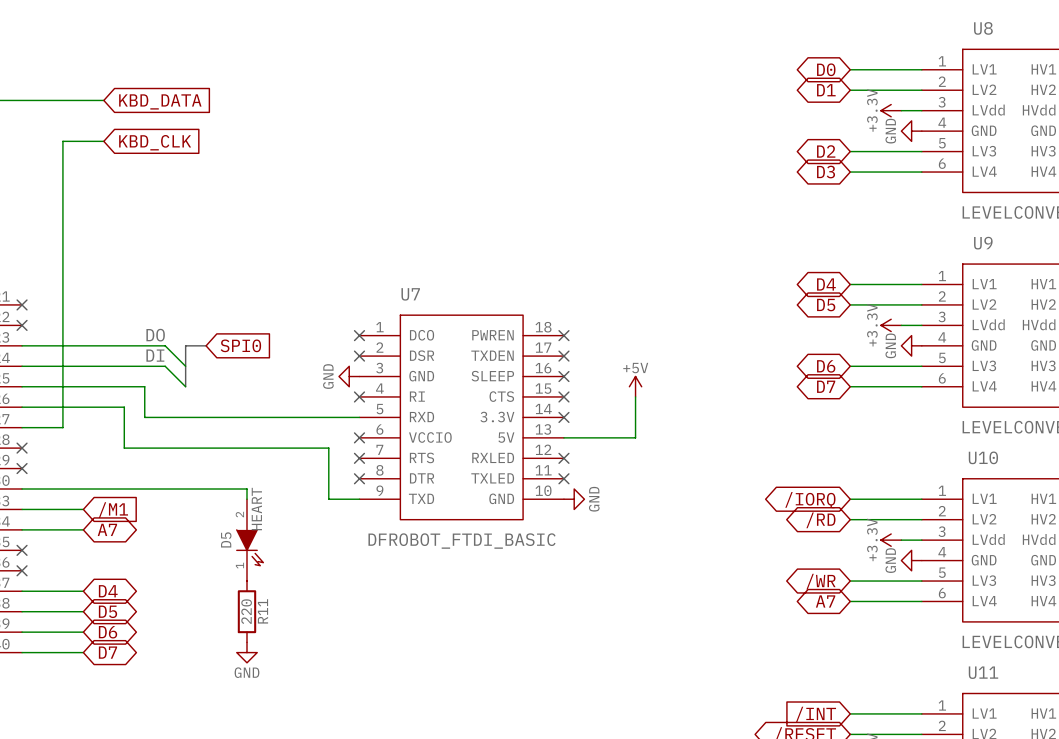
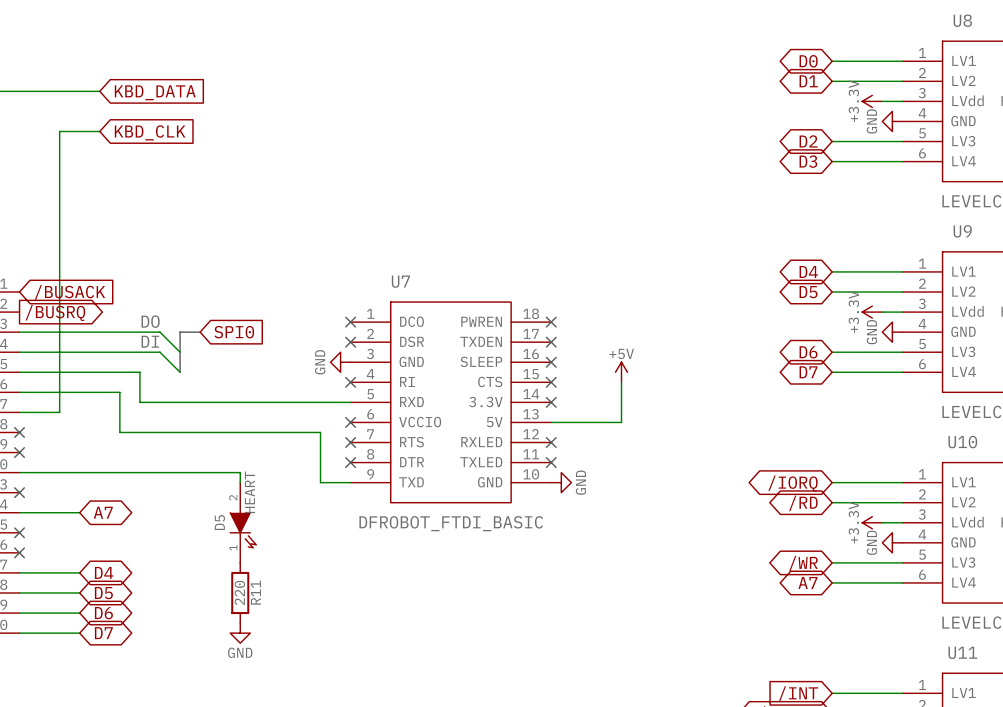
no-connect mark: (22, 304) -> none
global label: none -> /BUSACK (69, 292)
no-connect mark: (22, 325) -> none
global label: none -> /BUSRQ (55, 312)
wire: (22, 509) (83, 509) -> none
no-connect mark: none -> (19, 492)
global label: /M1 (113, 510) -> none

